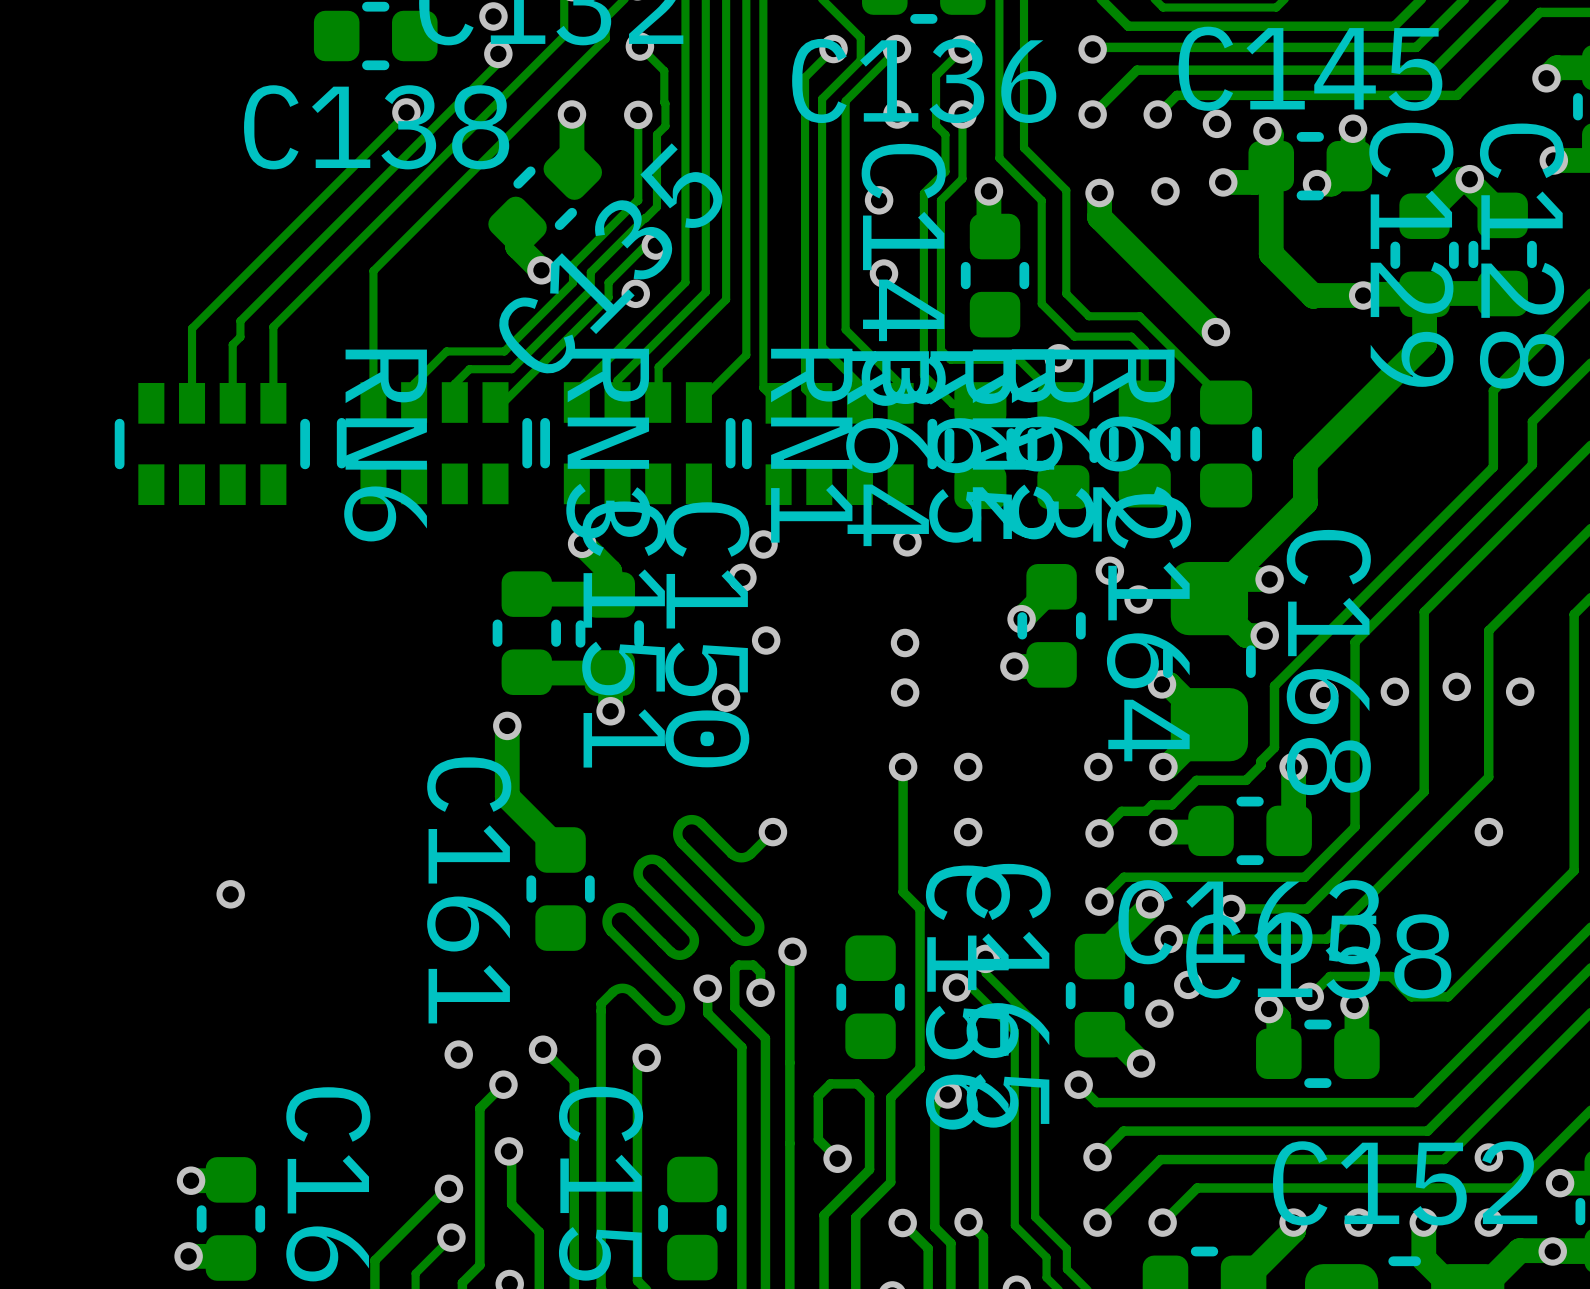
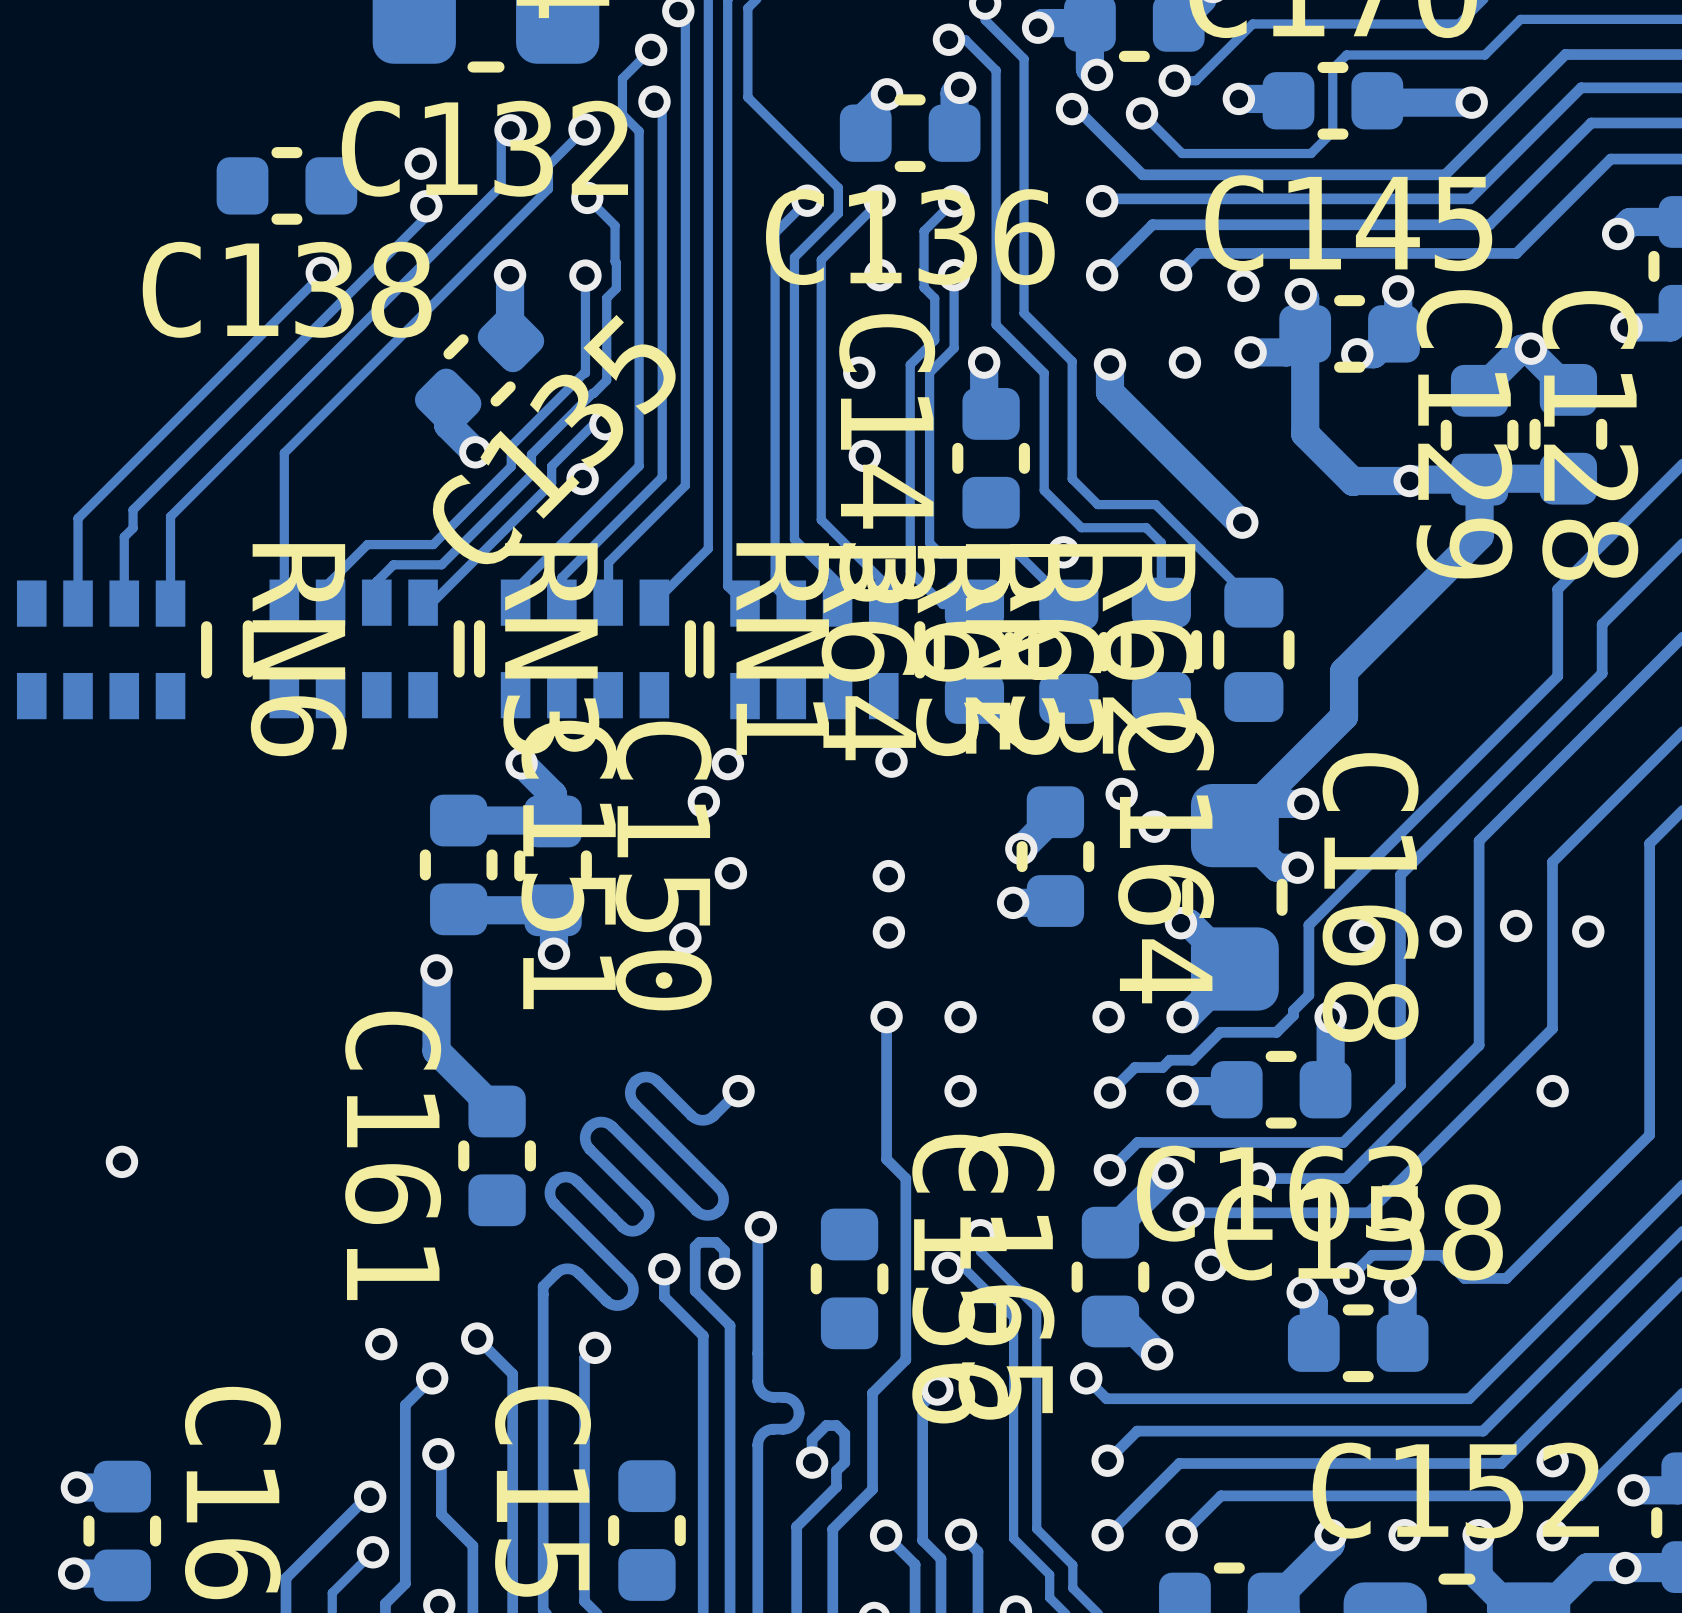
track: (789, 1087) (789, 1143) -> (757, 1381) (759, 1387) (764, 1394) (769, 1396) (791, 1399) (796, 1405) (799, 1413) (797, 1419) (792, 1425) (787, 1428) (765, 1431) (759, 1437) (757, 1445)
track: (837, 1158) (818, 1139) (818, 1096) (830, 1083) (857, 1083) (869, 1096) (869, 1169) (859, 1180) -> (812, 1462) (812, 1439) (826, 1425) (836, 1425) (844, 1433) (844, 1462) (836, 1470) (836, 1486)

